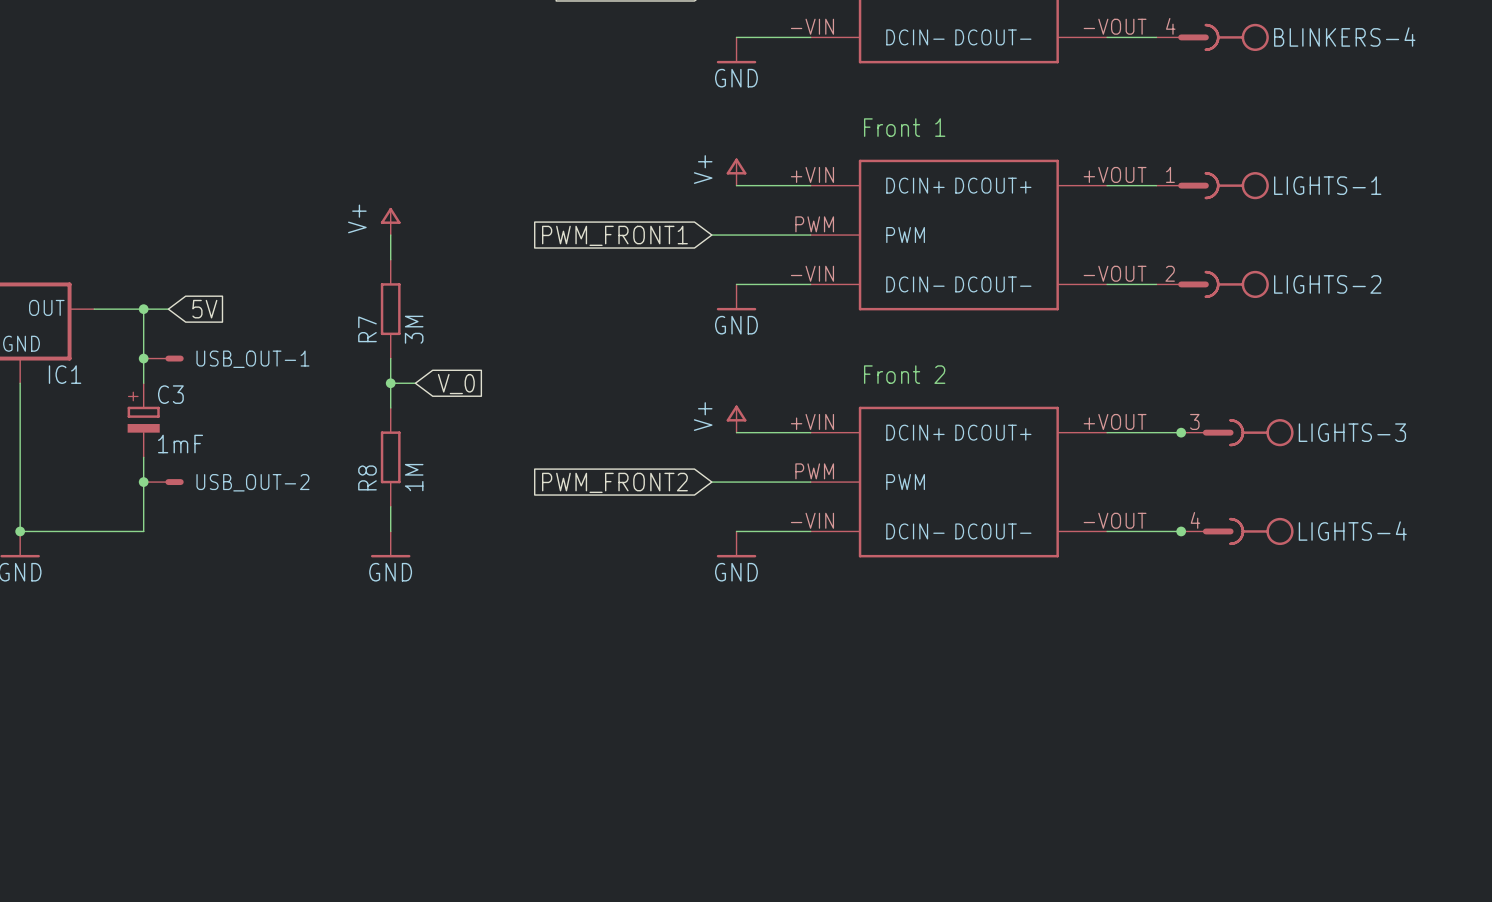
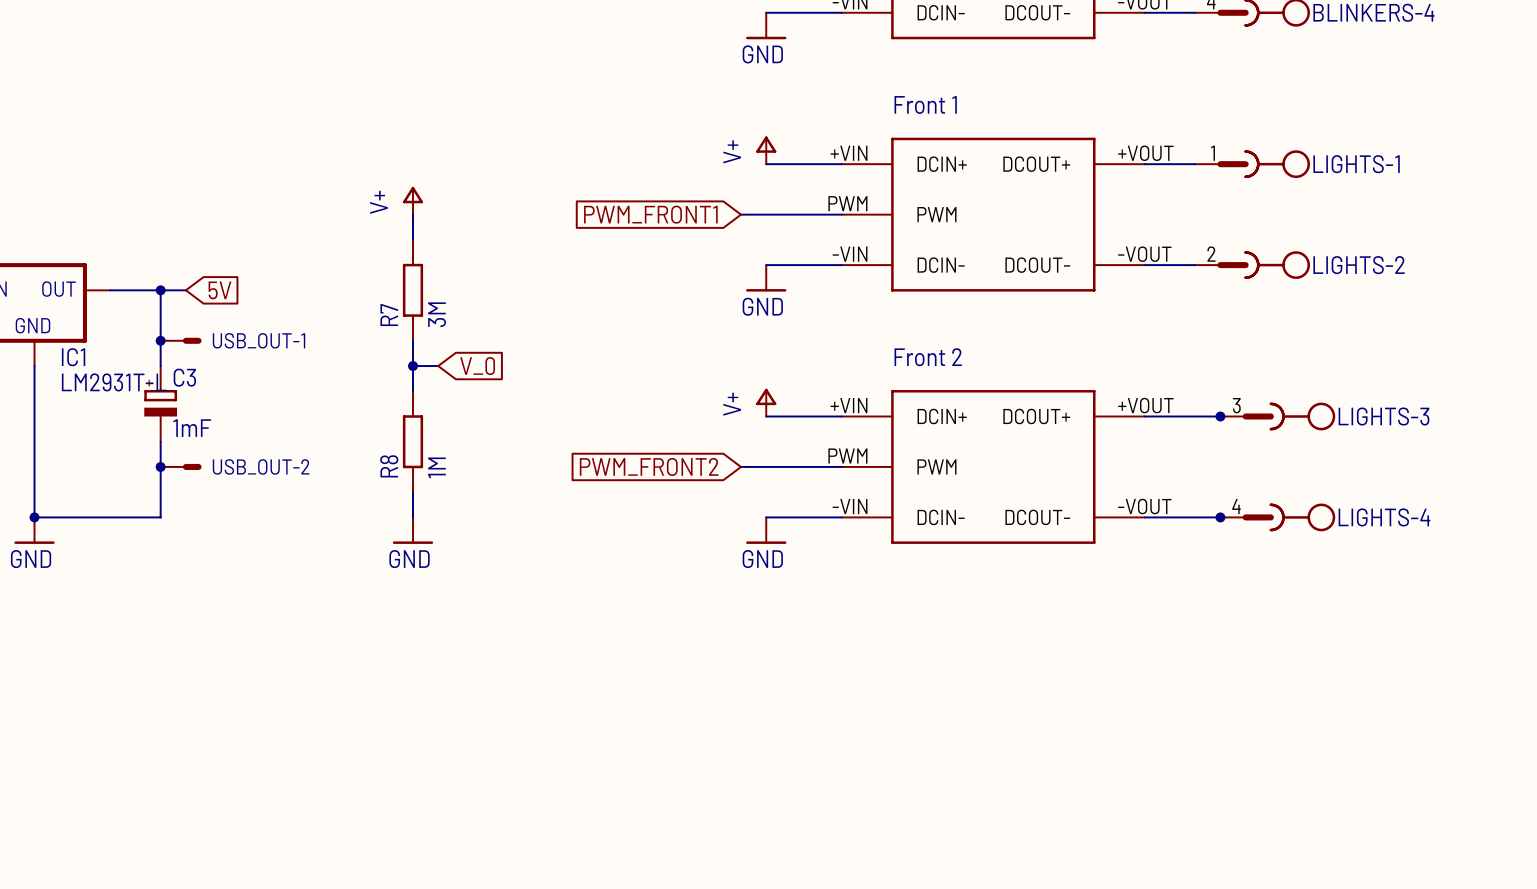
IC1 value: none -> LM2931T-L (114, 382)

